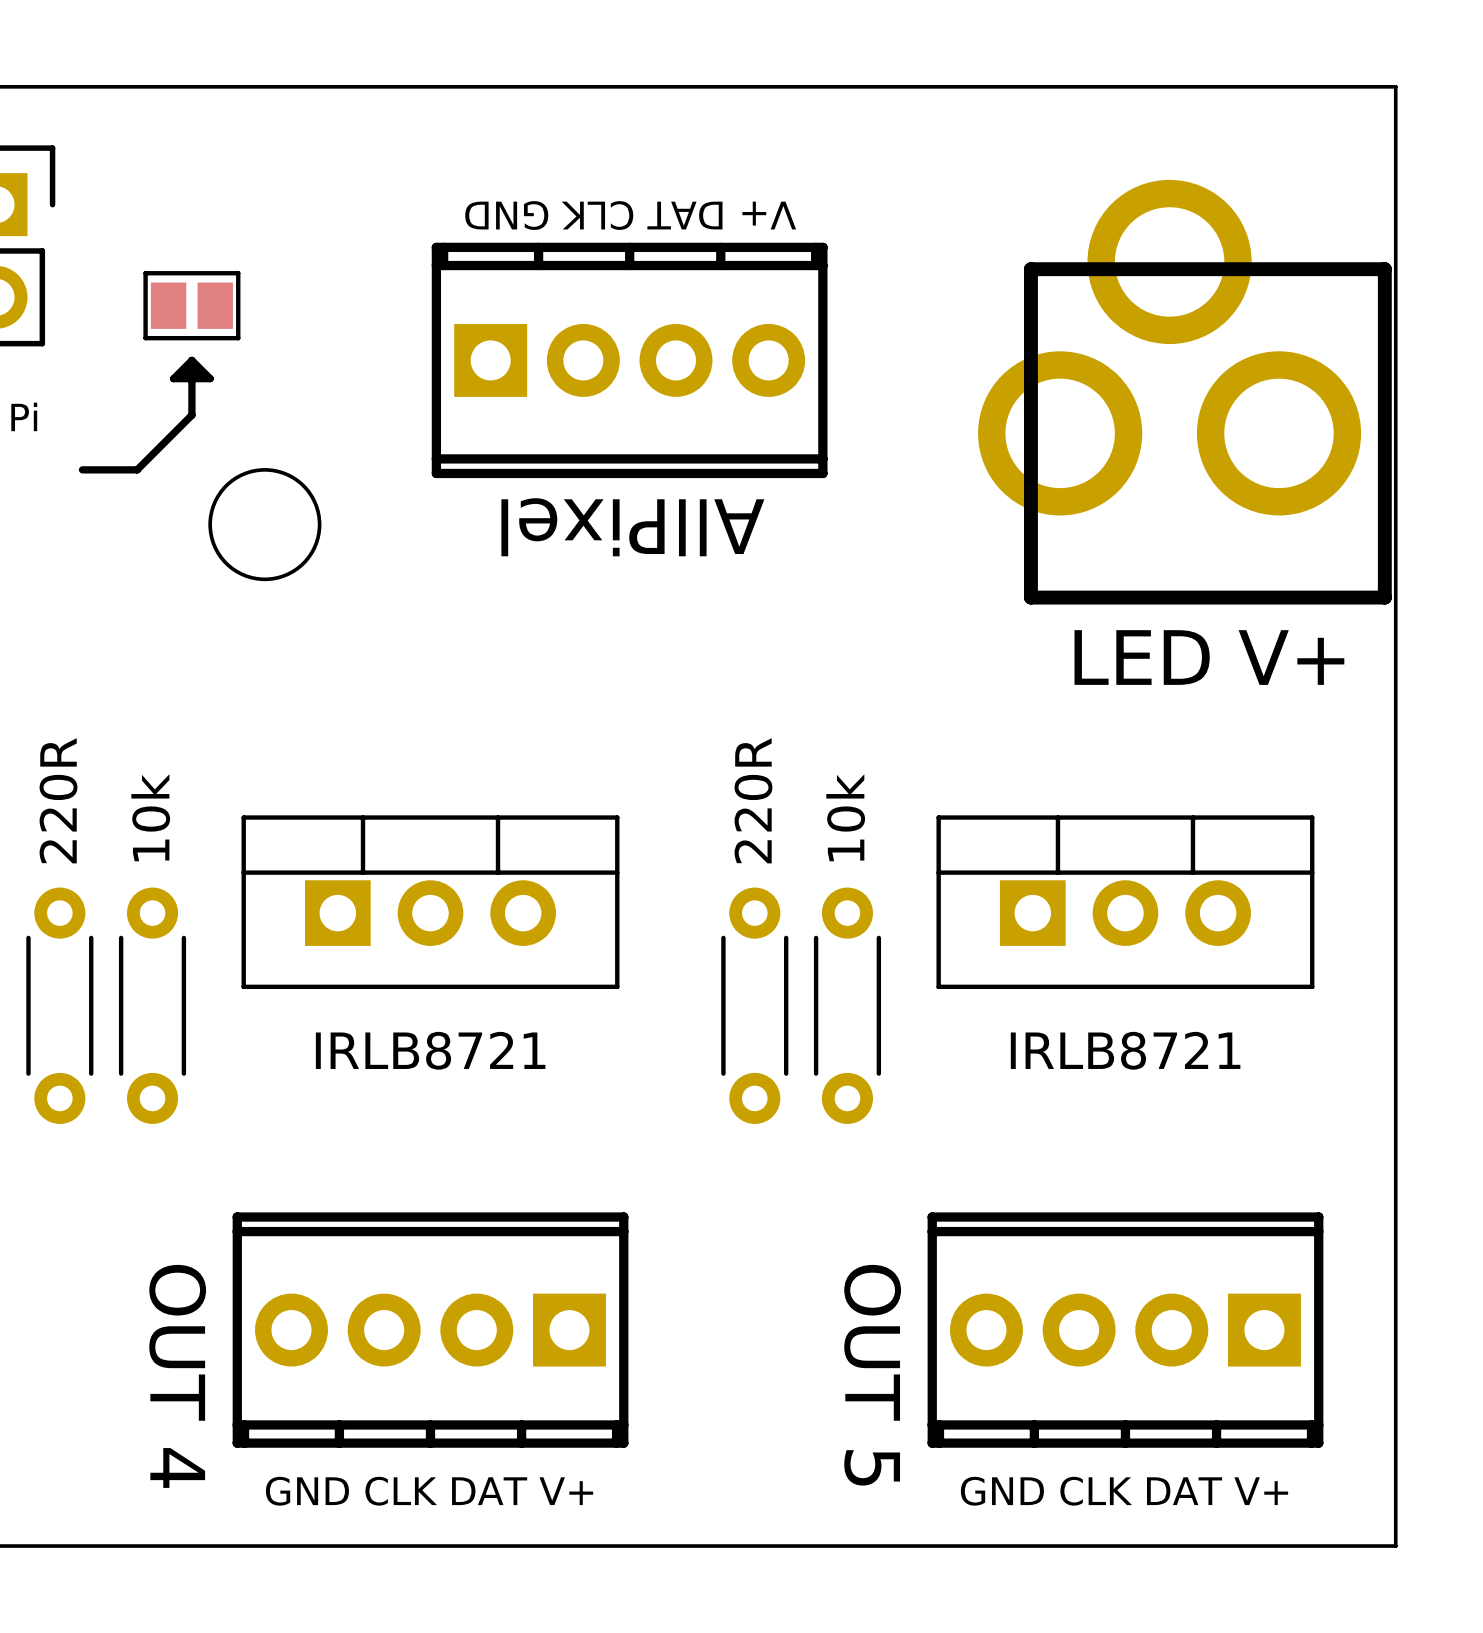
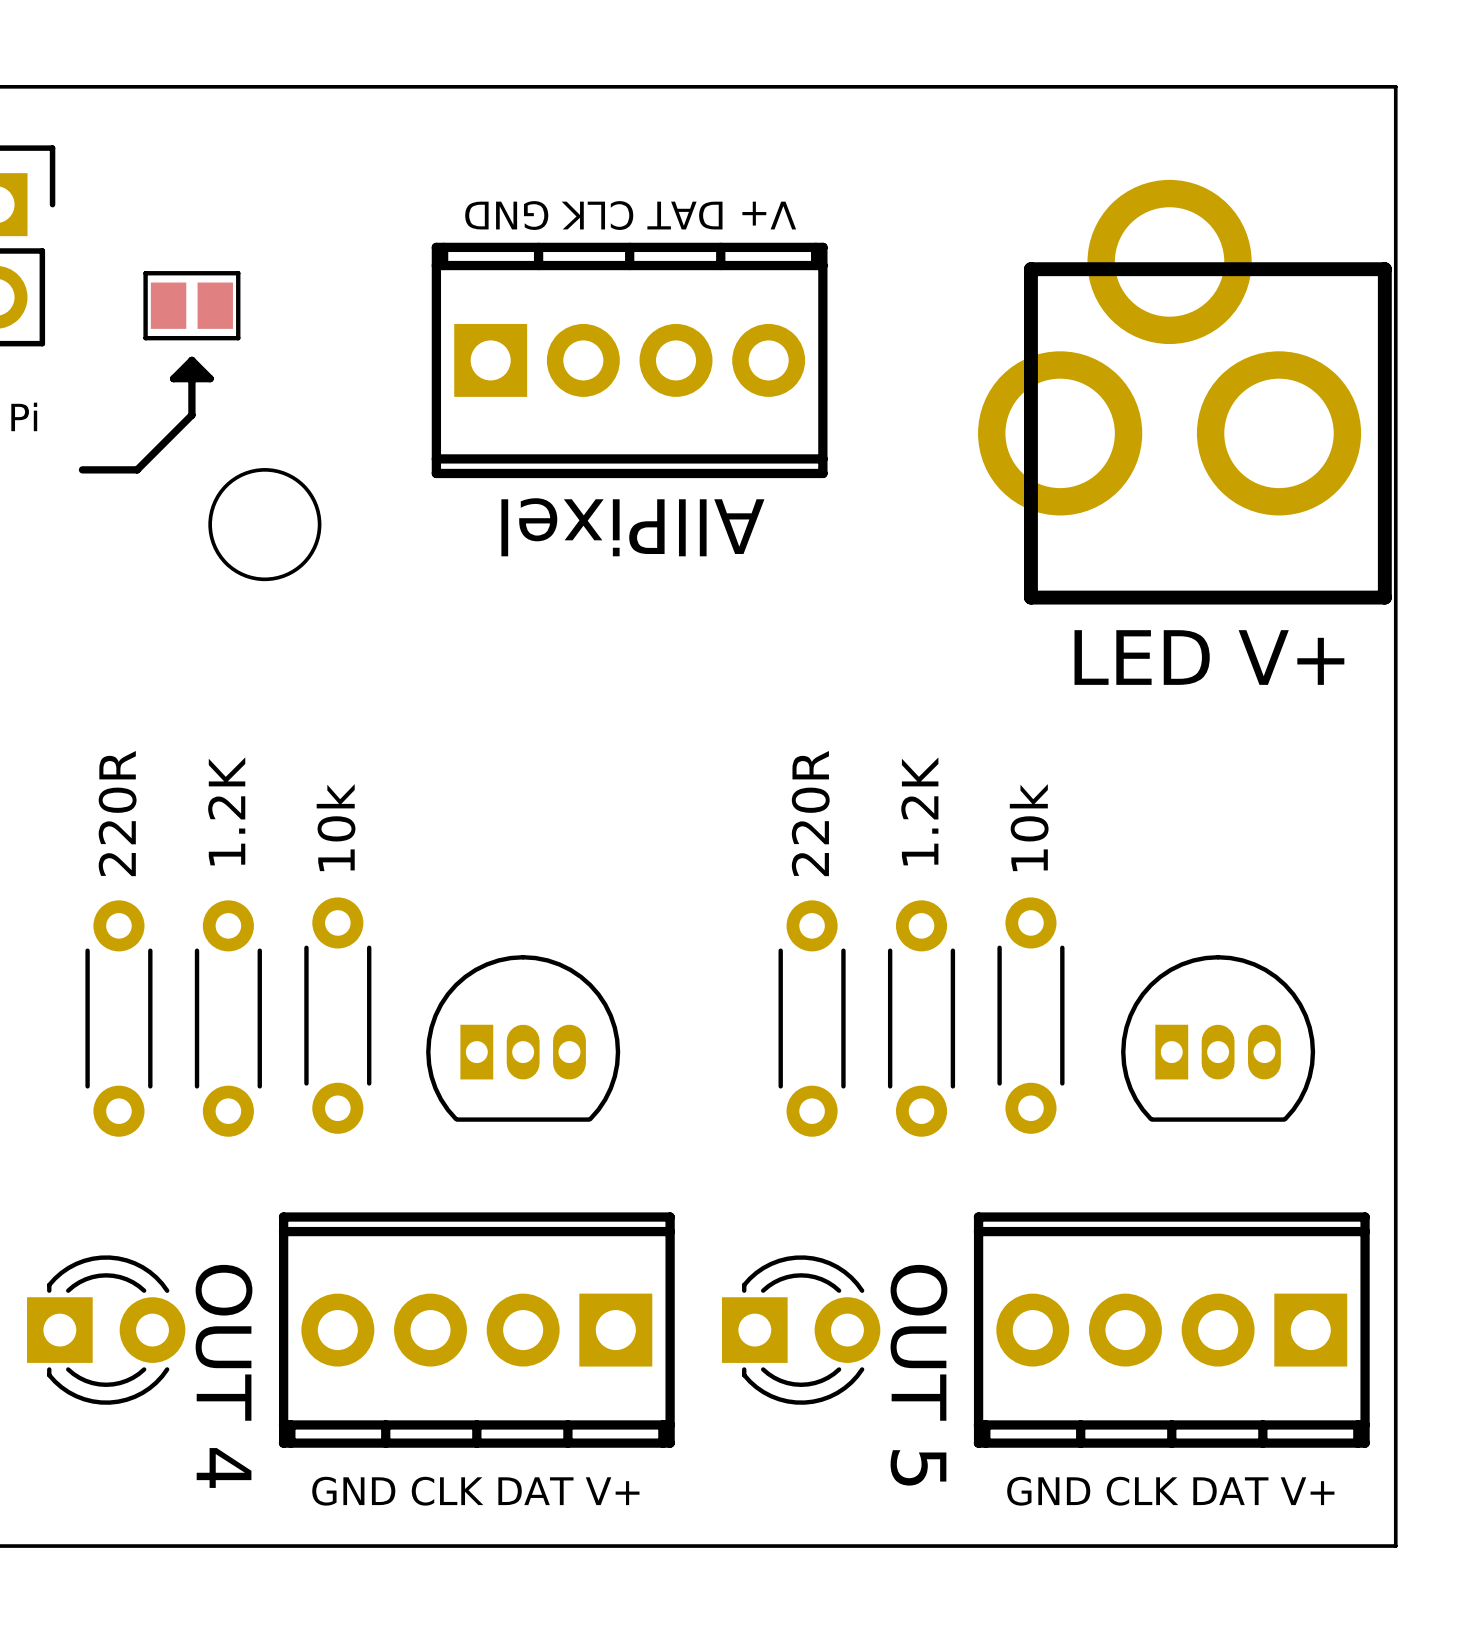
part: (430, 902) -> none
part: (1125, 902) -> none
part position: (59, 1005) -> (118, 1018)
part position: (152, 1005) -> (337, 1015)
part position: (754, 1005) -> (812, 1018)
part position: (847, 1005) -> (1030, 1015)
part: none -> 1.2K (228, 1018)
part: none -> 1.2K (921, 1018)
part: none -> (523, 1038)
part: none -> (1218, 1038)
text: IRLB8721 (430, 1050) -> none
text: IRLB8721 (1125, 1050) -> none
part: none -> (106, 1330)
part position: (430, 1330) -> (476, 1330)
part: none -> (801, 1330)
part position: (1125, 1330) -> (1171, 1330)
text position: OUT 5 (872, 1375) -> OUT 5 (918, 1375)
text position: OUT 4 (177, 1376) -> OUT 4 (224, 1376)
text position: GND CLK DAT V+ (429, 1491) -> GND CLK DAT V+ (475, 1491)
text position: GND CLK DAT V+ (1124, 1491) -> GND CLK DAT V+ (1170, 1491)

